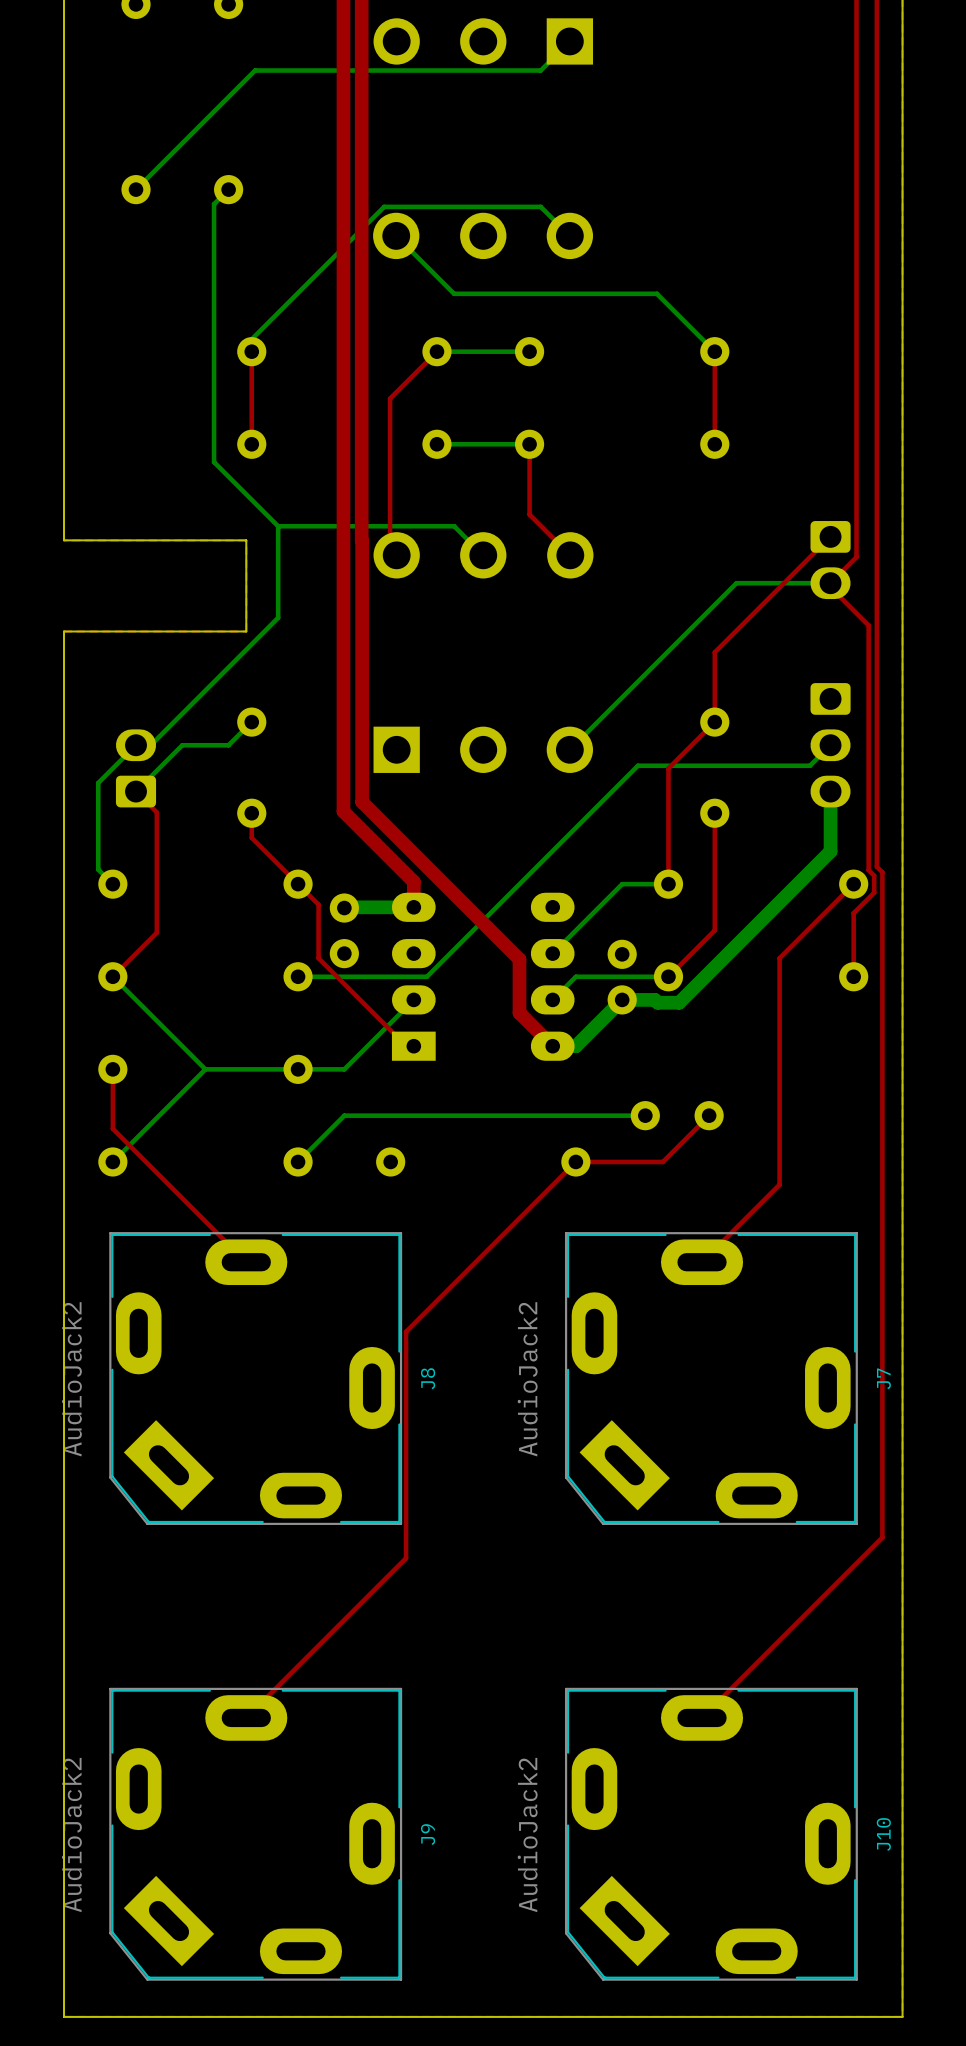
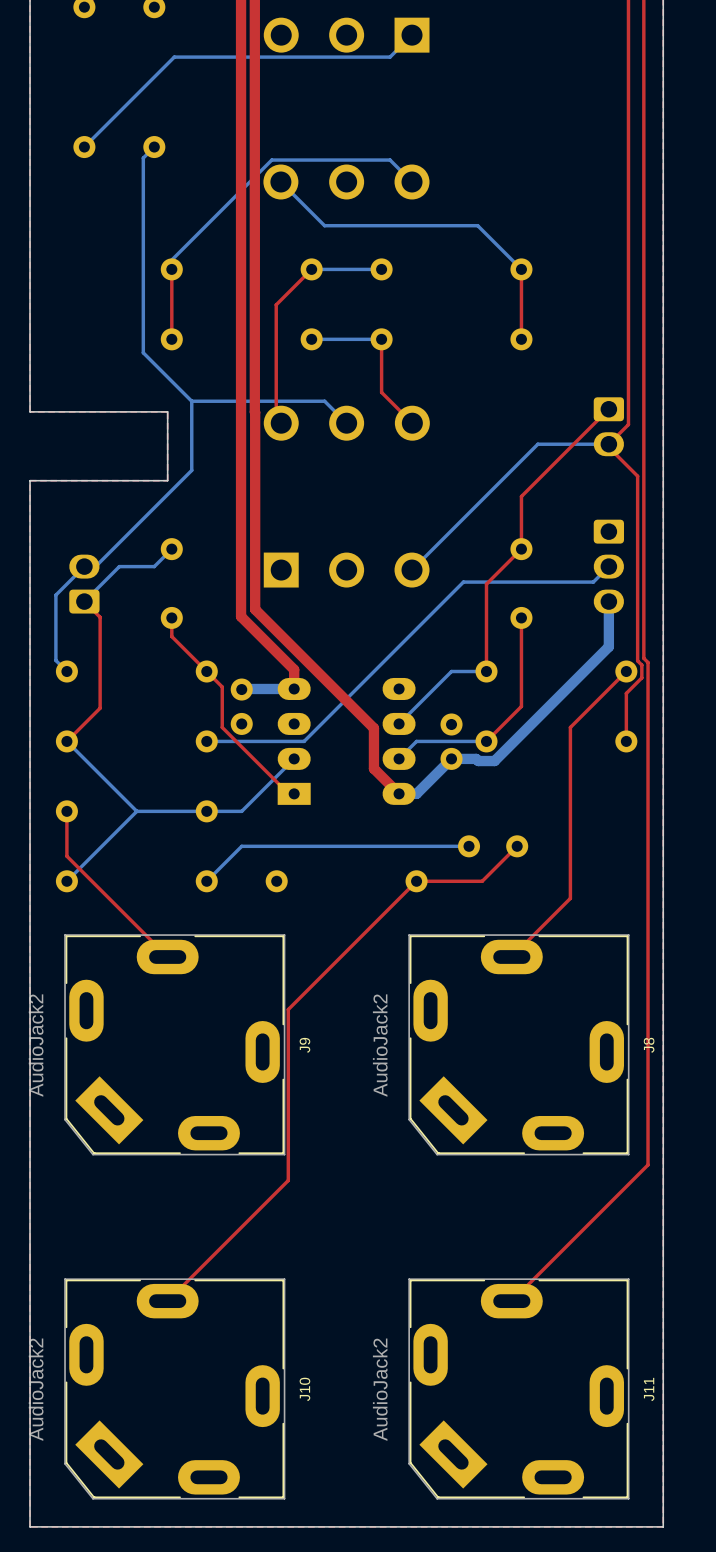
J8 name: J8 (428, 1378) -> J9 (304, 1045)
J7 name: J7 (883, 1378) -> J8 (649, 1045)
J9 name: J9 (428, 1834) -> J10 (304, 1389)
J10 name: J10 (883, 1834) -> J11 (649, 1389)

